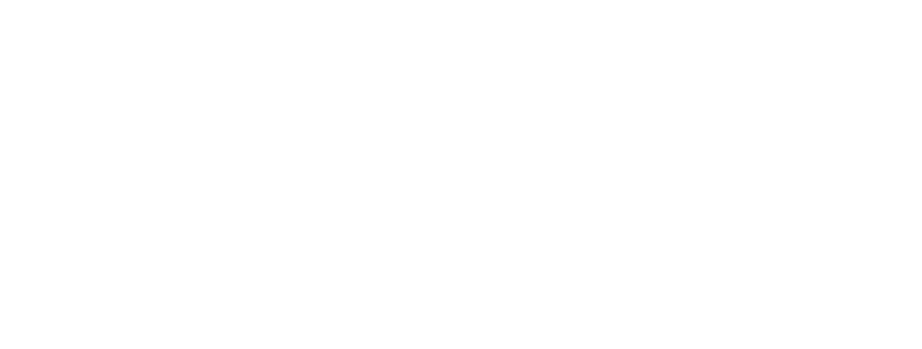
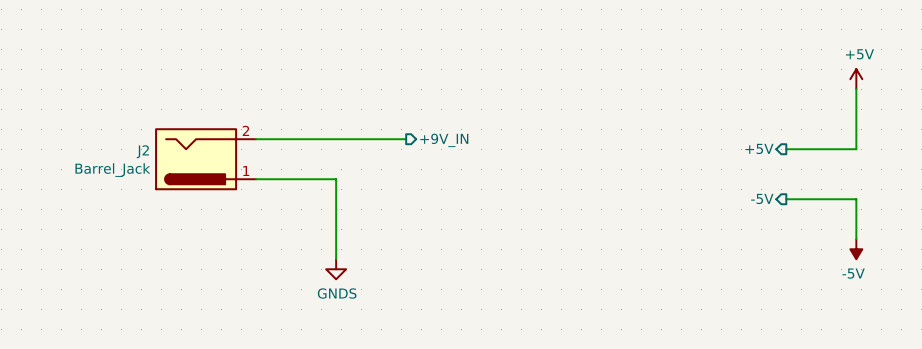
power symbol: none -> +5V (856, 79)
wire: none -> (856, 89) (856, 149) (786, 149)
wire: none -> (256, 139) (406, 139)
sheet pin: none -> +9V_IN (444, 140)
sheet pin: none -> +5V (759, 148)
J2: none -> Barrel_Jack (205, 159)
wire: none -> (256, 179) (336, 179) (336, 259)
sheet pin: none -> -5V (762, 198)
wire: none -> (786, 199) (856, 199) (856, 239)
power symbol: none -> -5V (856, 249)
power symbol: none -> GNDS (336, 269)

